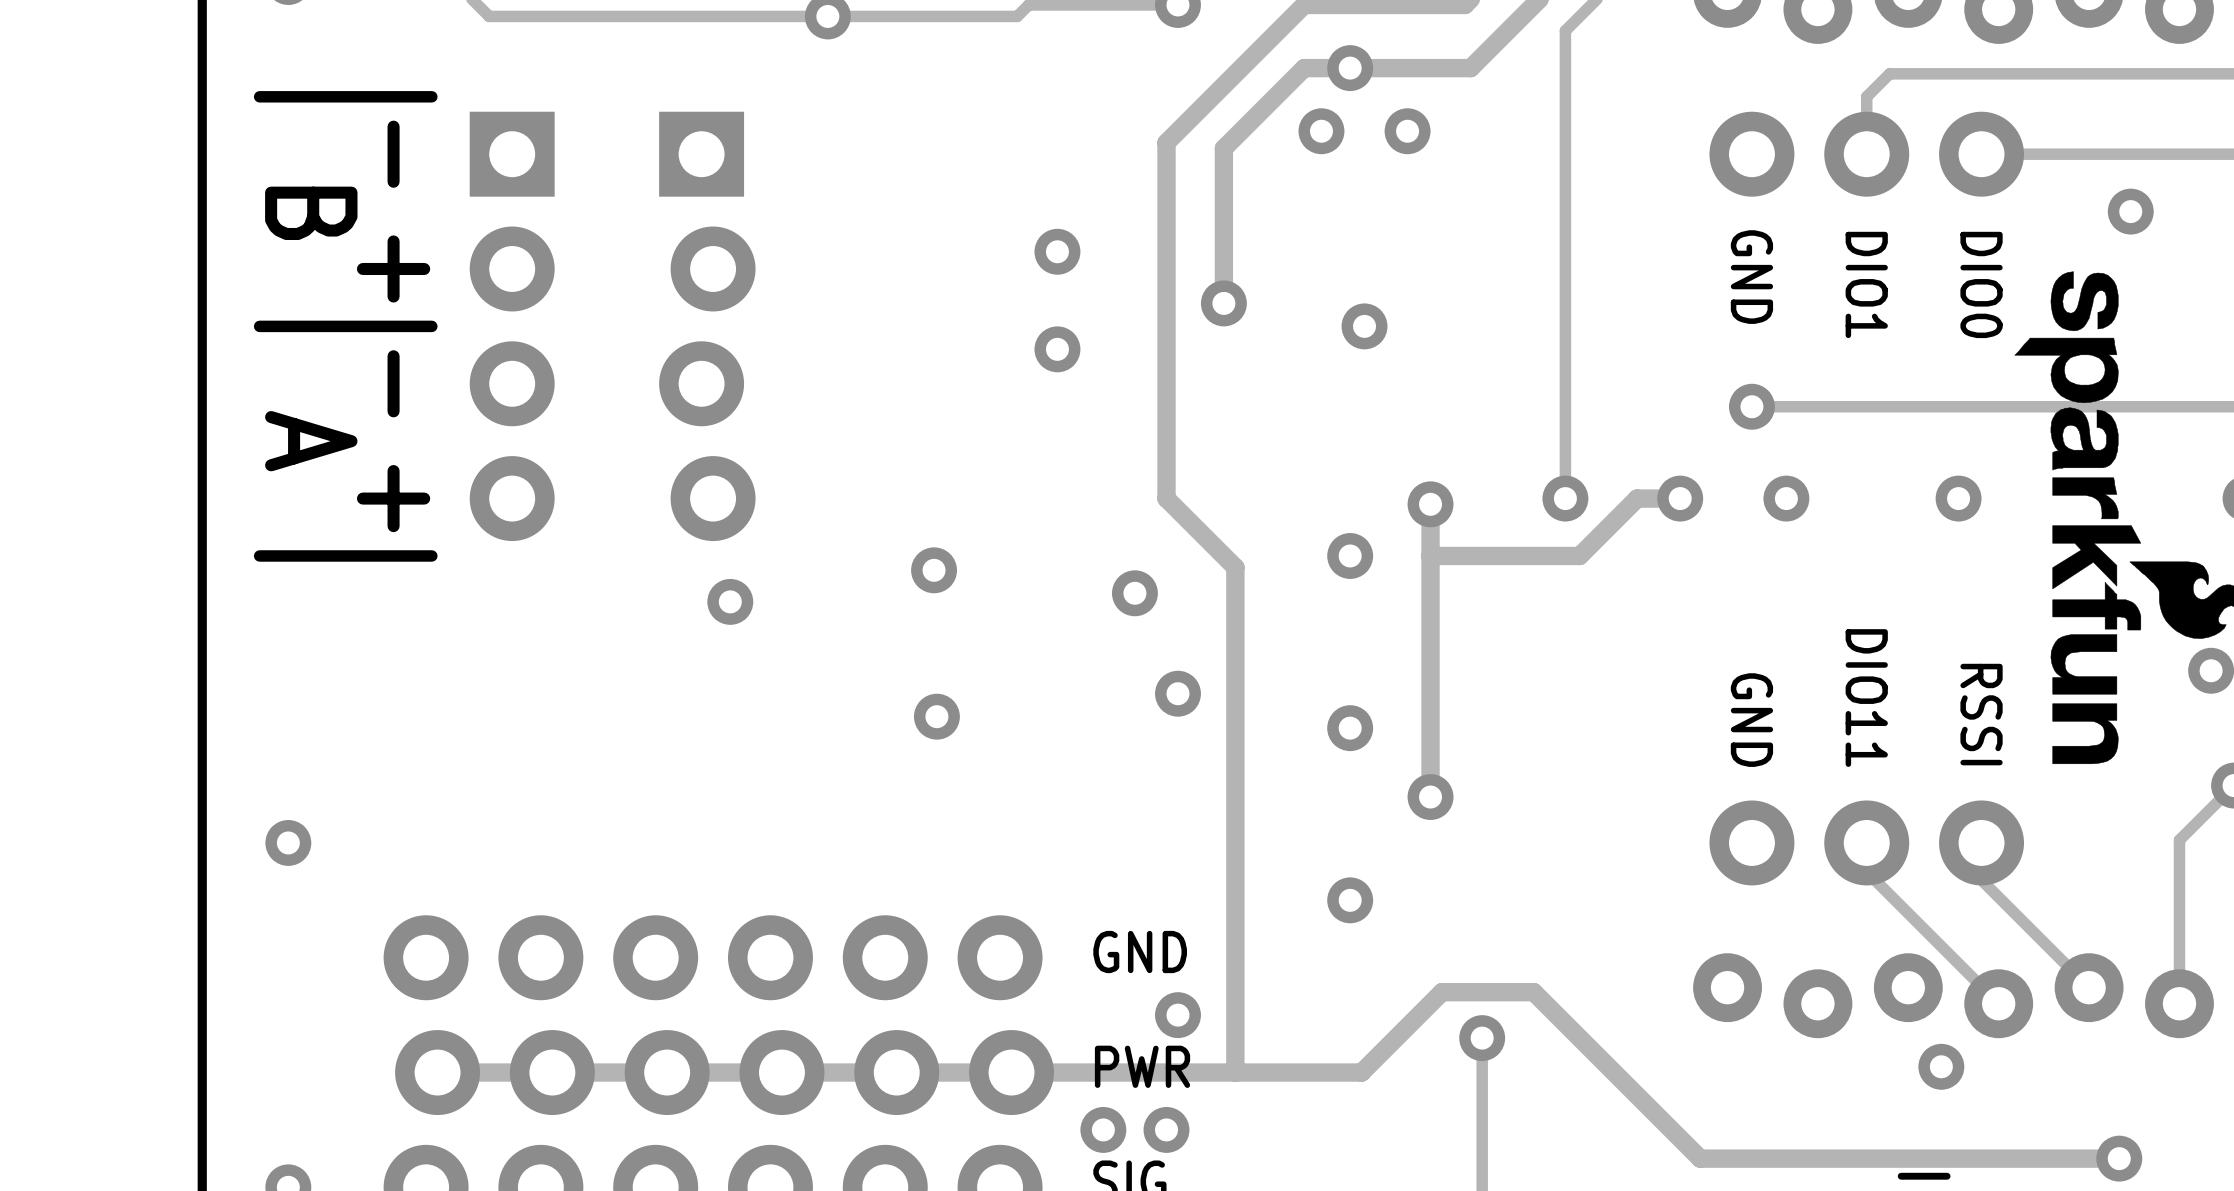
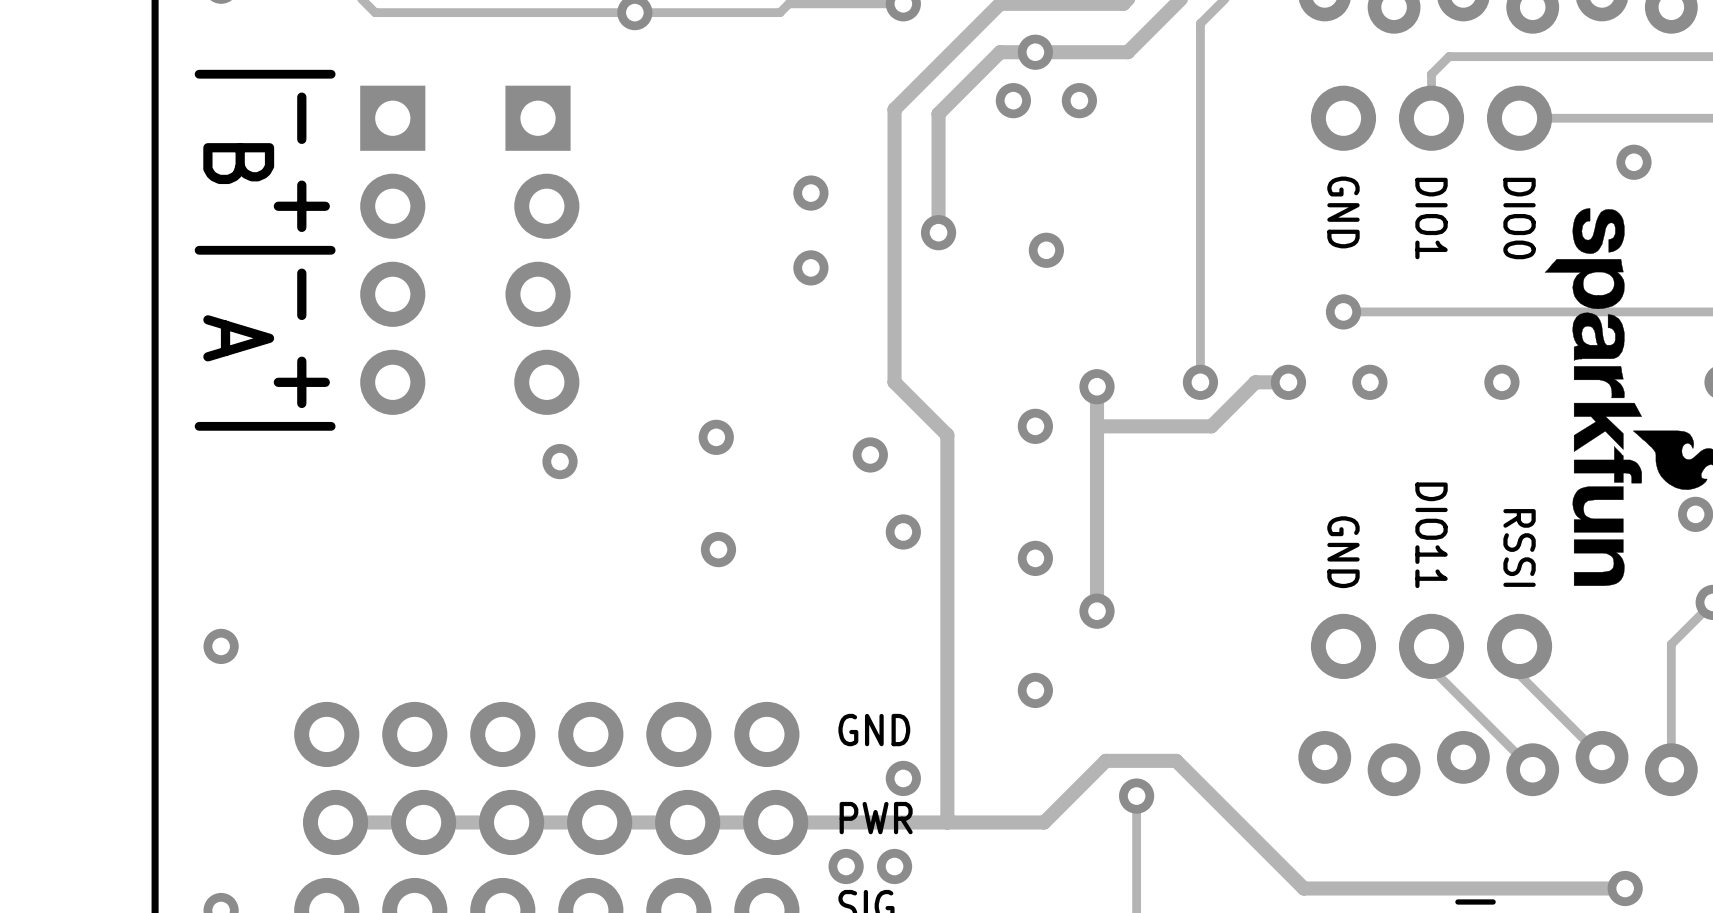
via: (1941, 1066) -> none

